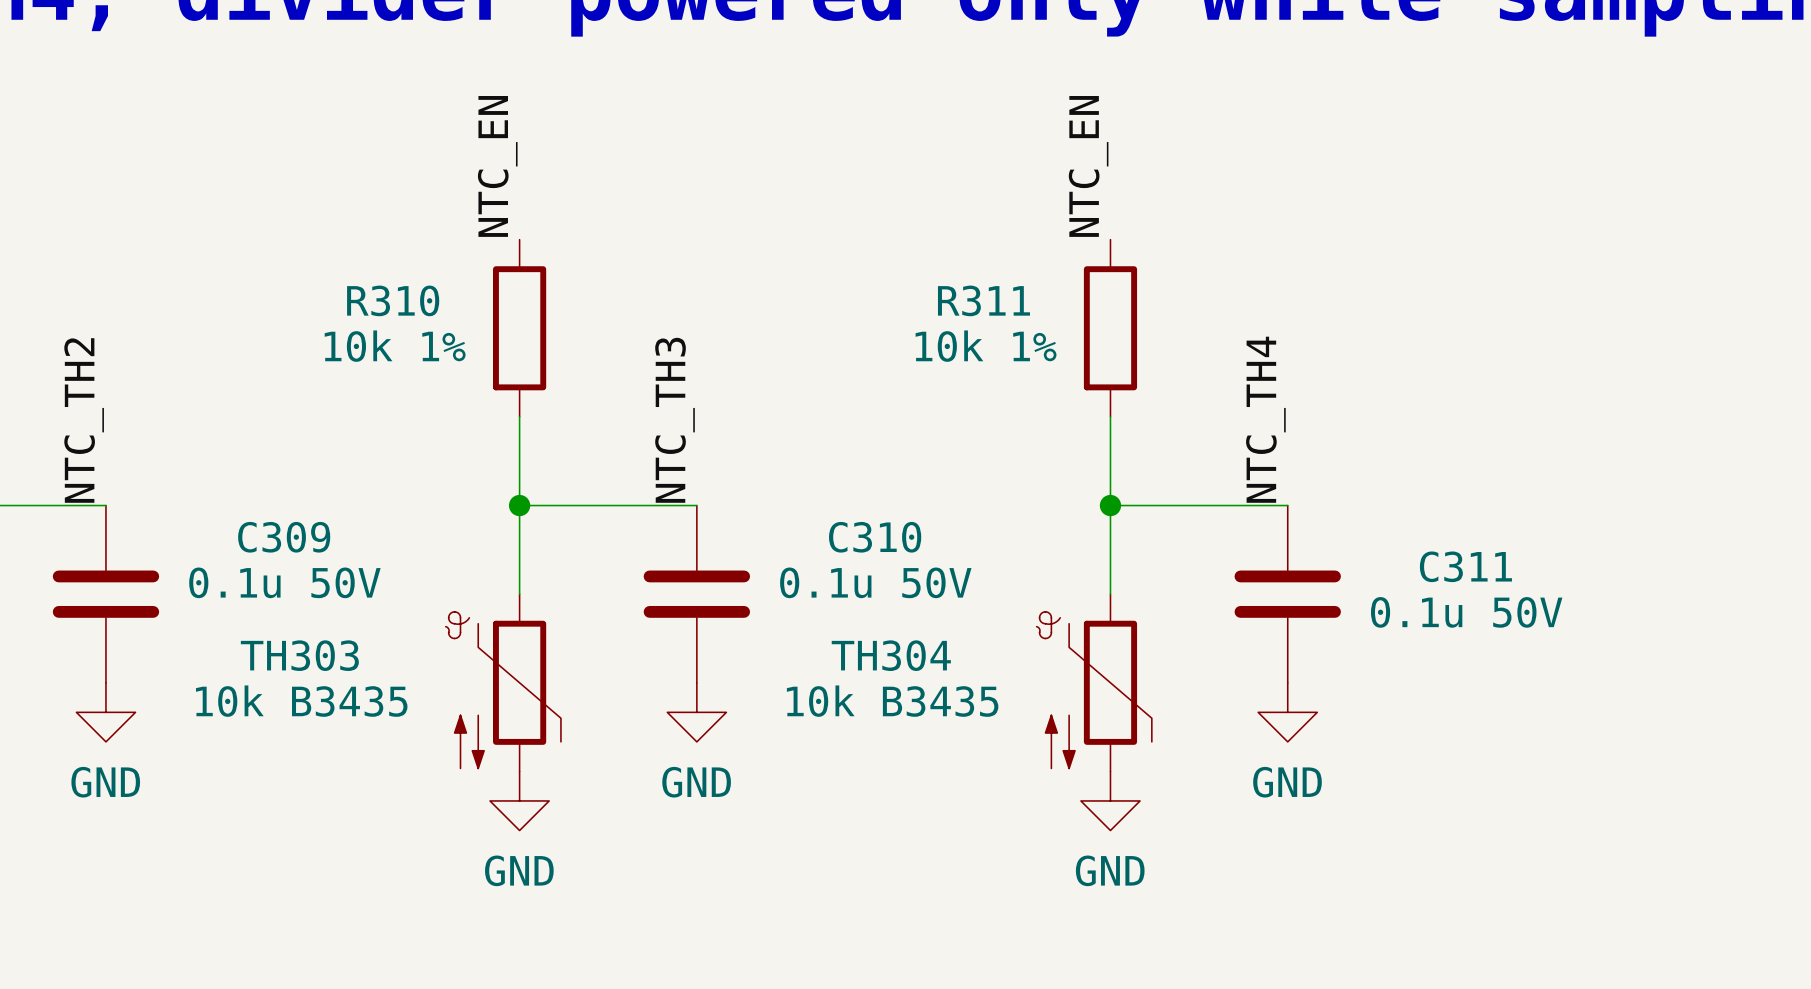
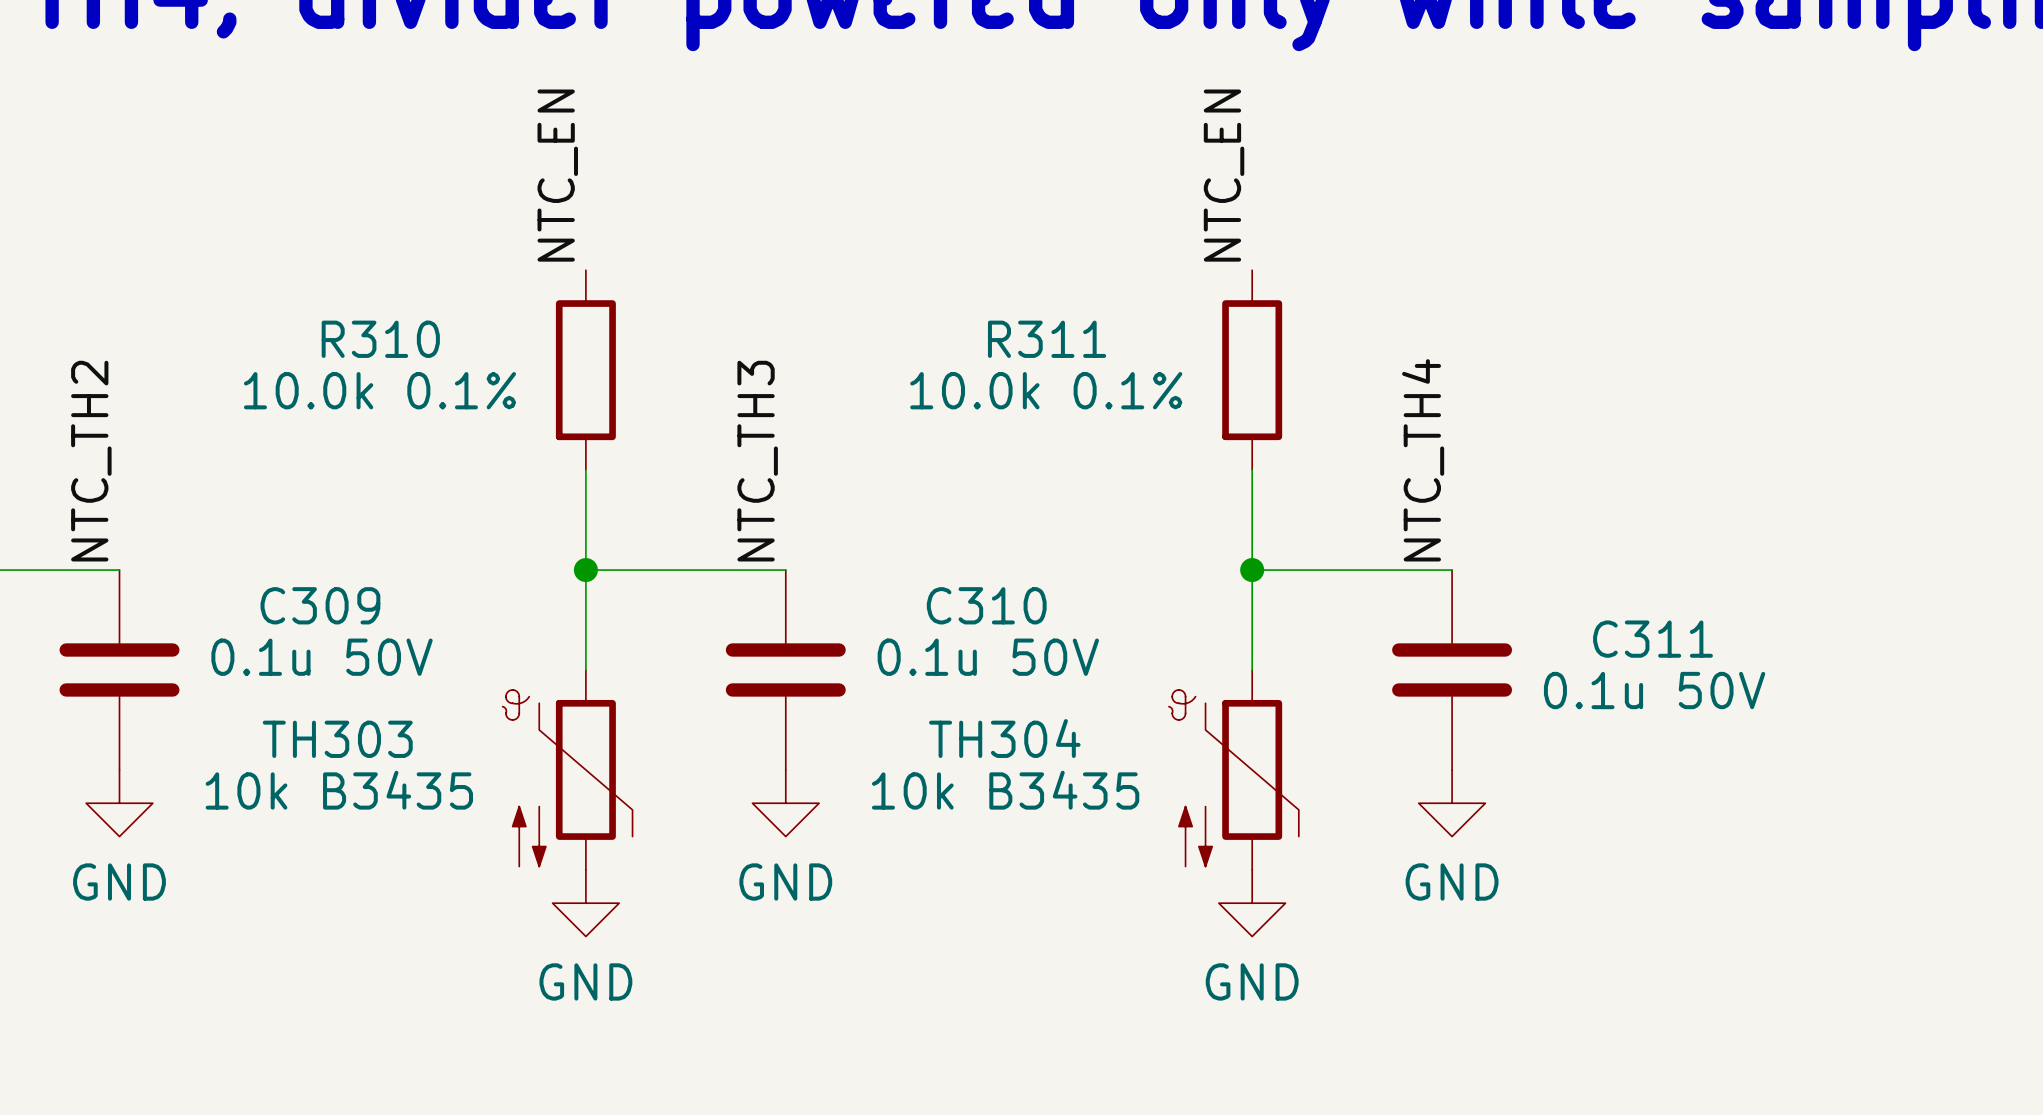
R310 name position: R310 (393, 300) -> R310 (380, 339)
R311 name position: R311 (983, 300) -> R311 (1047, 339)
R310 value: 10k 1% (395, 346) -> 10.0k 0.1% (379, 390)
R311 value: 10k 1% (986, 346) -> 10.0k 0.1% (1046, 390)

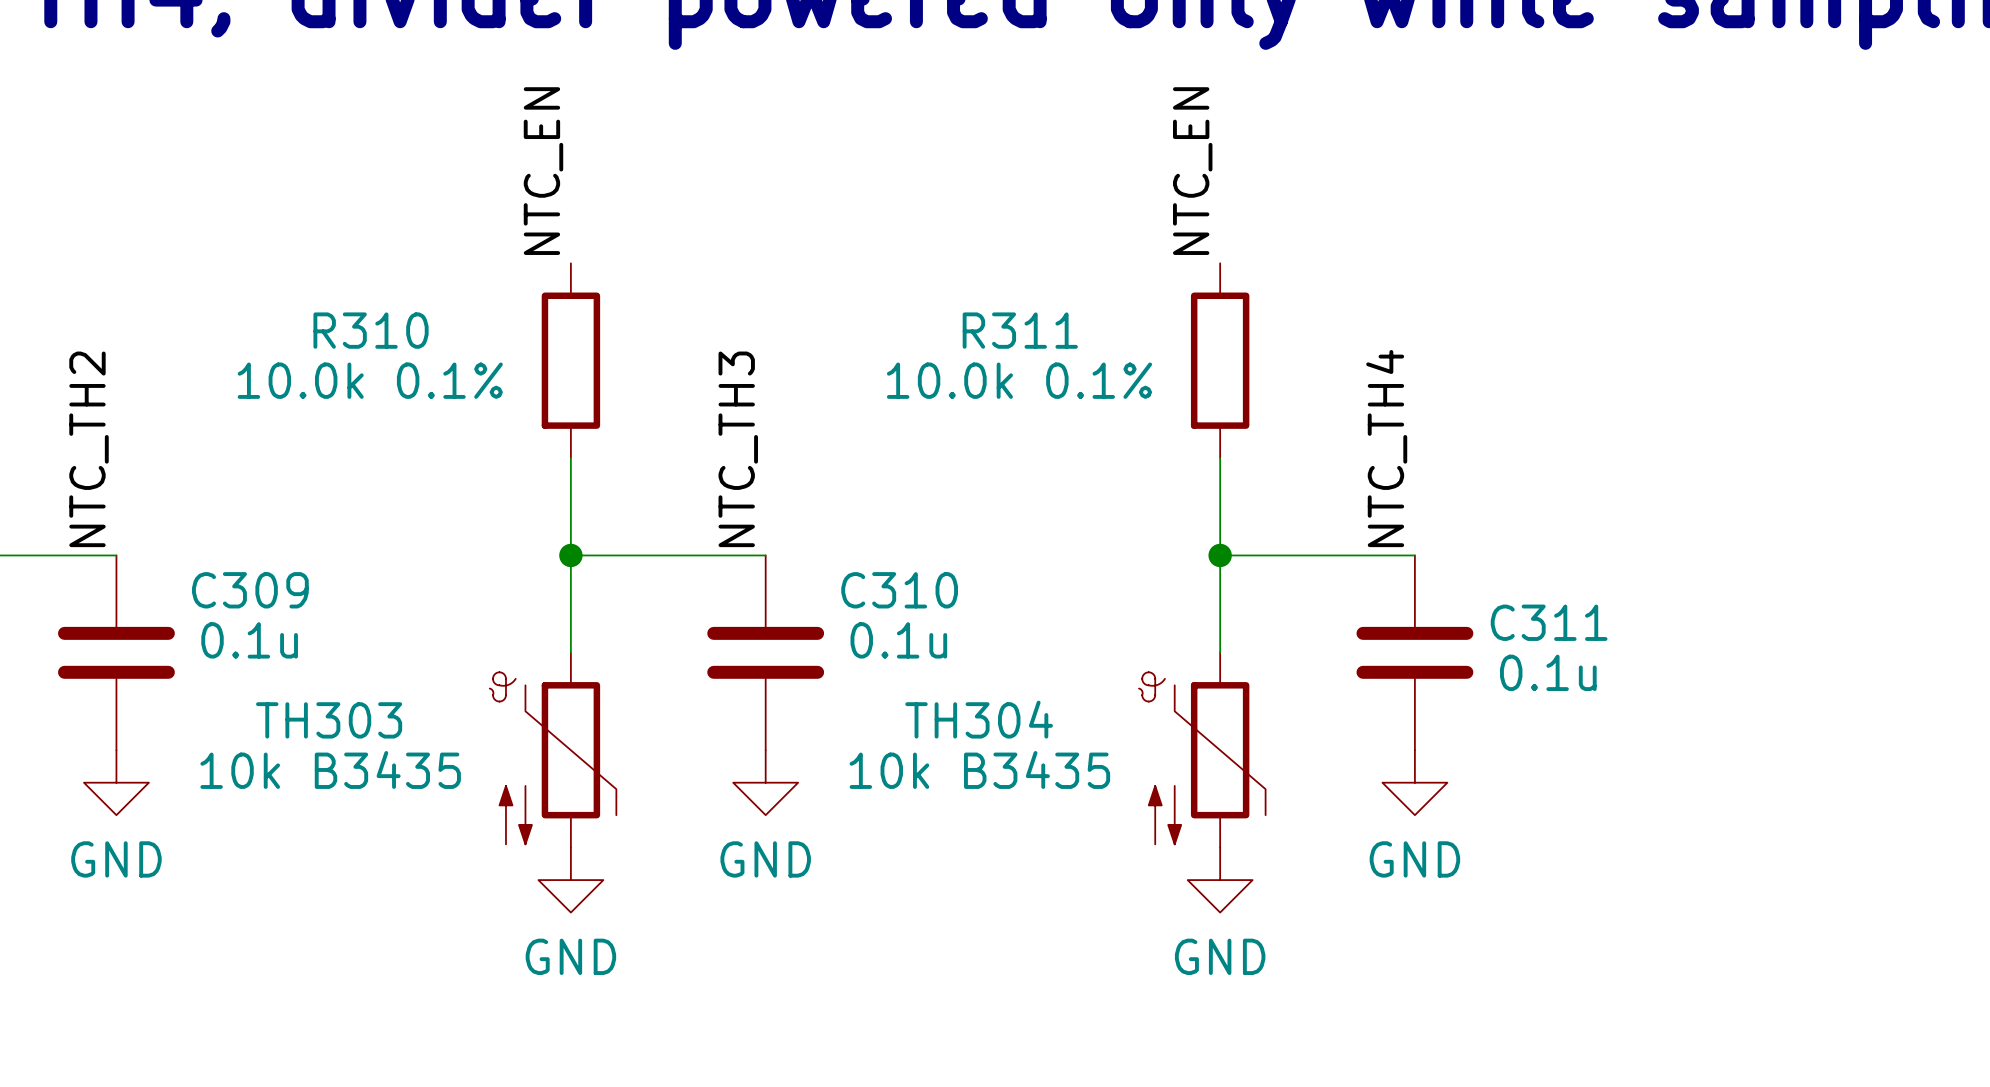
C309 name position: C309 (320, 605) -> C309 (250, 590)
C310 name position: C310 (986, 605) -> C310 (899, 590)
C311 name position: C311 (1653, 639) -> C311 (1549, 622)
C309 value: 0.1u 50V (322, 657) -> 0.1u (249, 640)
C310 value: 0.1u 50V (988, 657) -> 0.1u (898, 640)
C311 value: 0.1u 50V (1654, 690) -> 0.1u (1548, 672)

